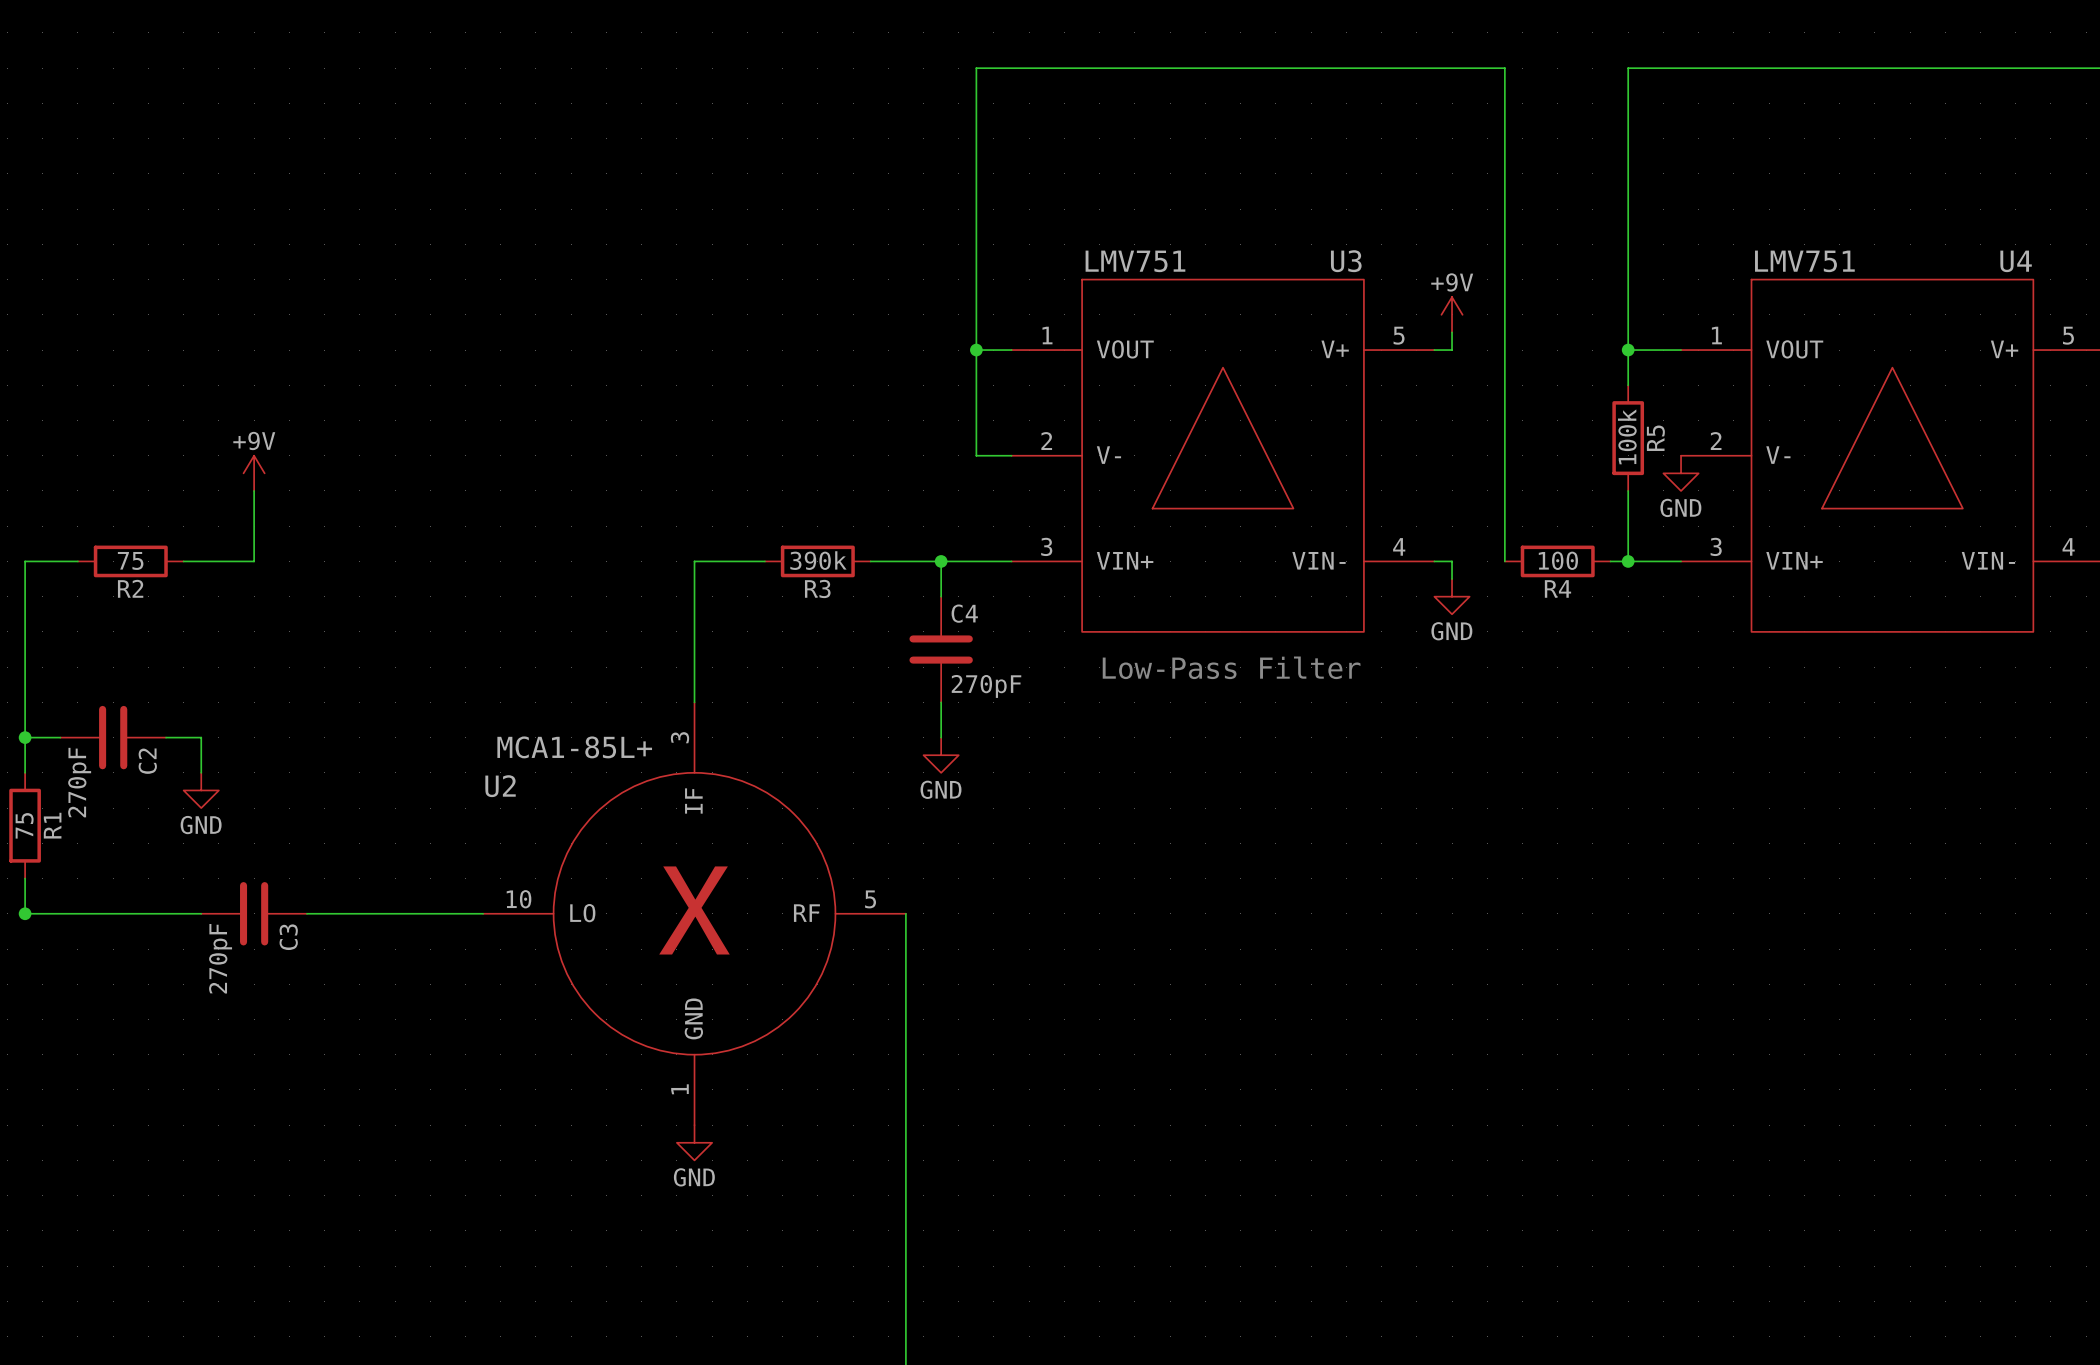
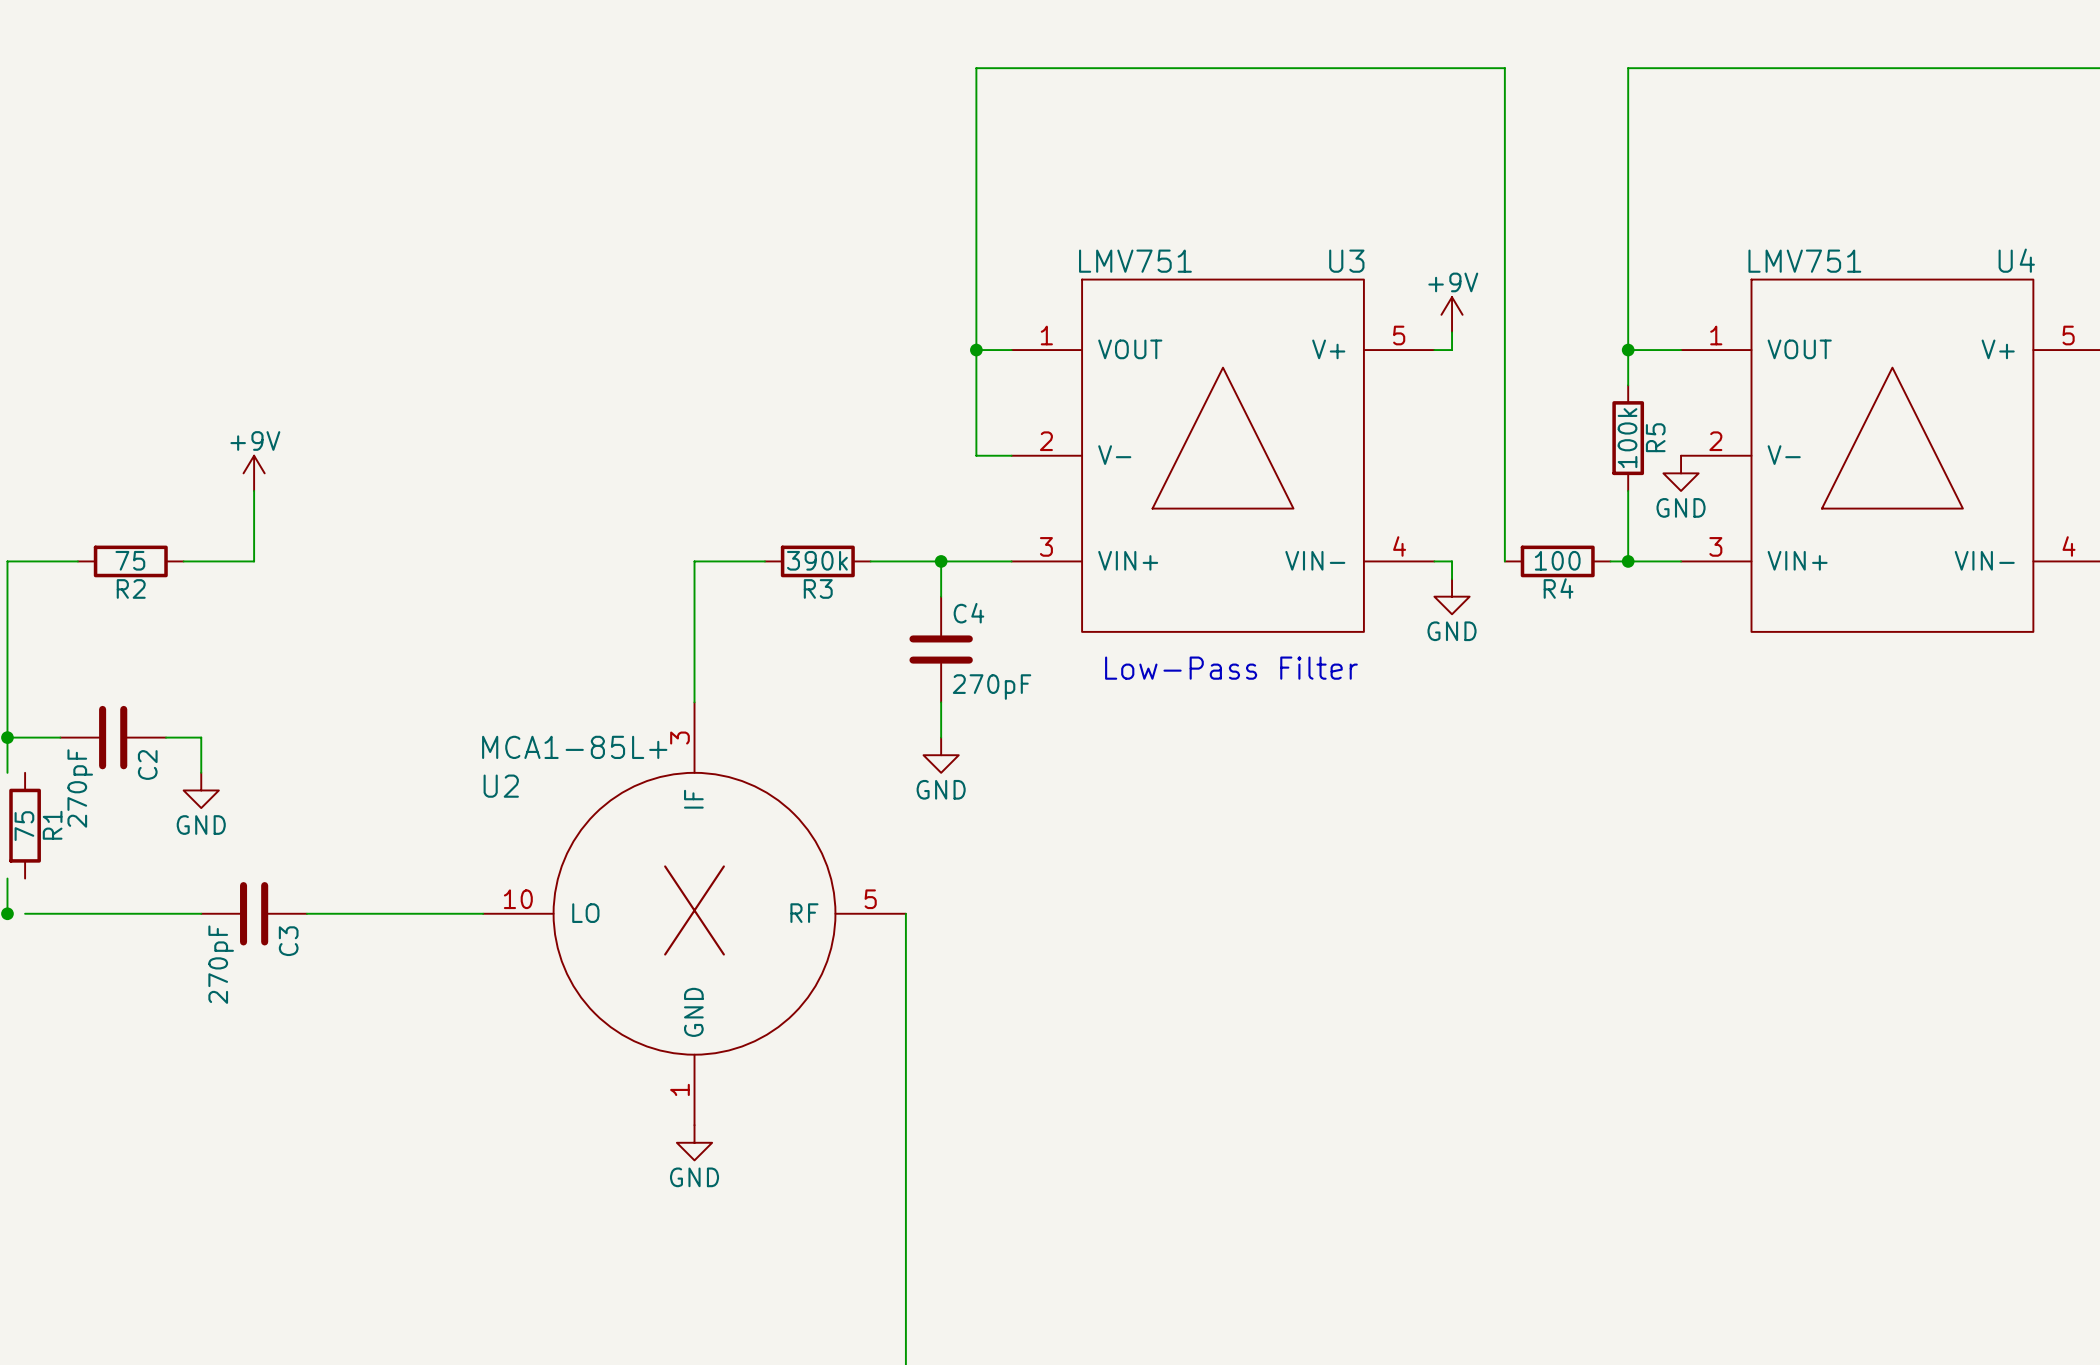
wire: (25, 561) (25, 772) -> (25, 561) (7, 561) (7, 772)
wire: none -> (7, 737) (25, 737)
junction position: (25, 737) -> (7, 737)
wire: (25, 878) (25, 913) -> (7, 878) (7, 913)
junction position: (25, 913) -> (7, 913)

